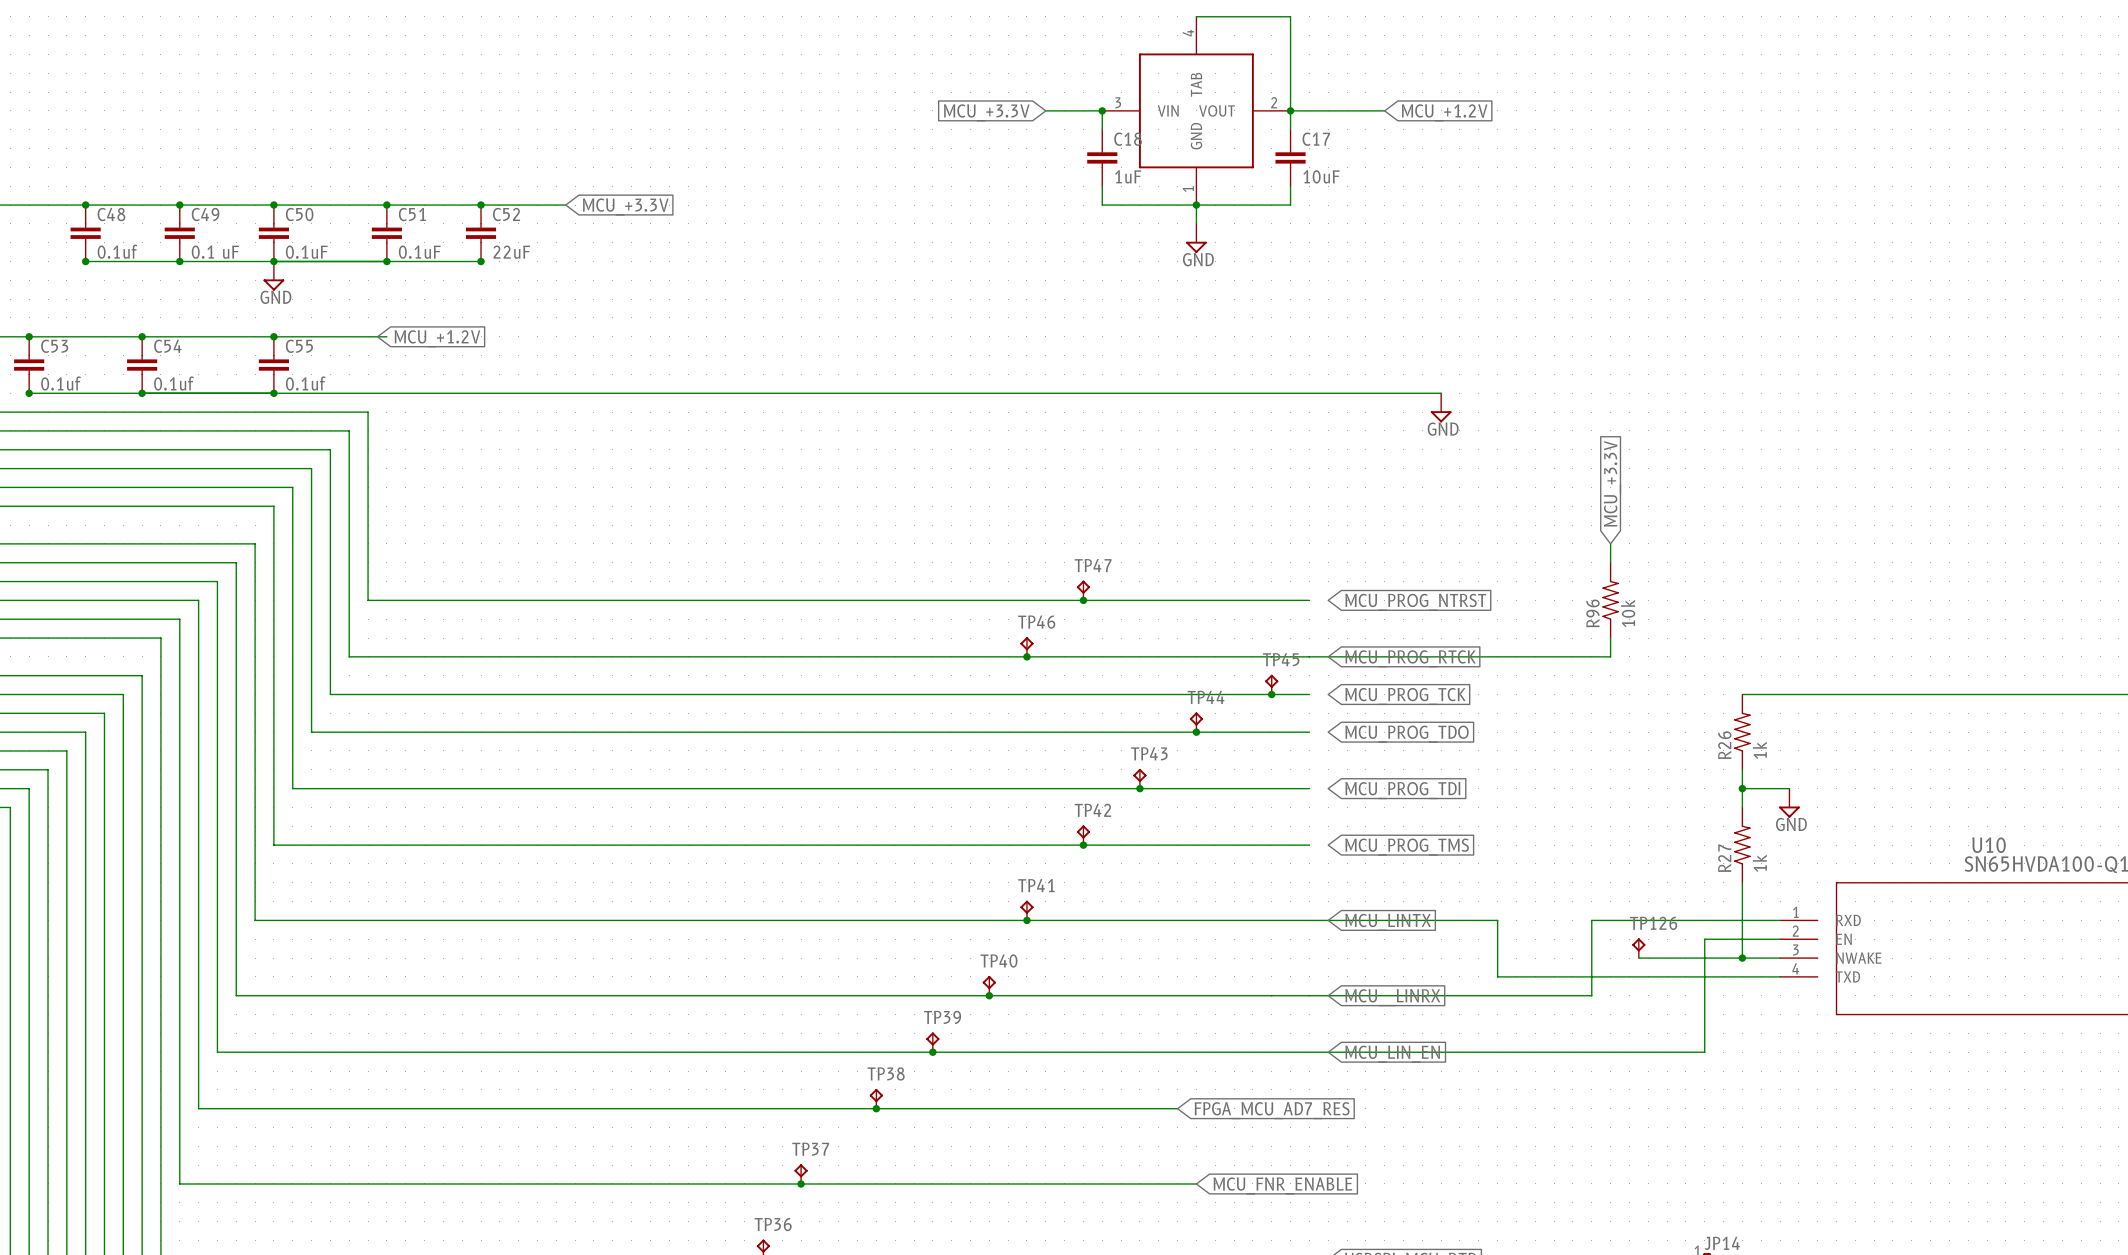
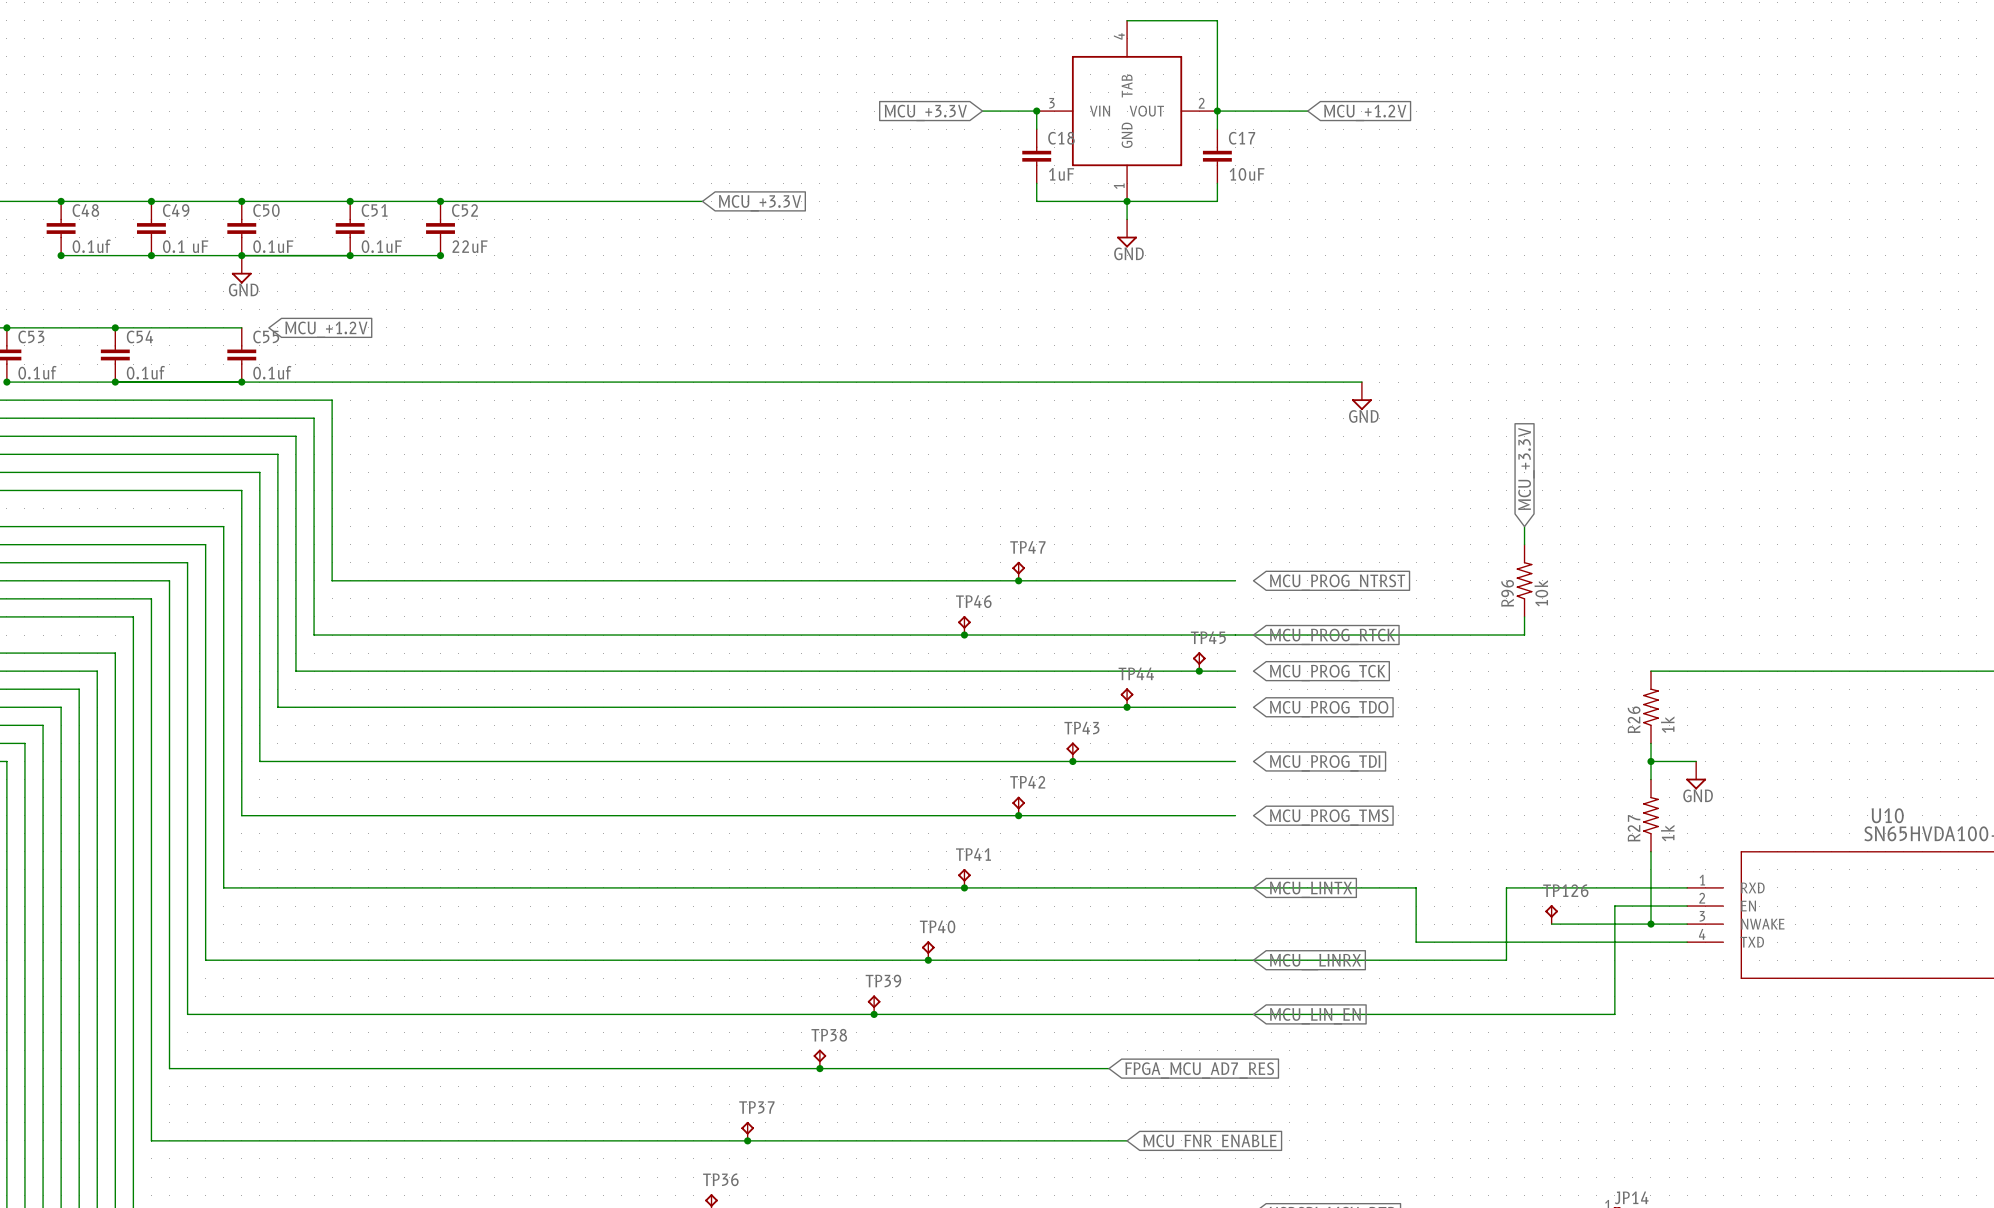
wire: none -> (521, 201) (702, 201)
global label: MCU_+3.3V (625, 206) -> none
global label: none -> MCU_+3.3V (760, 203)
wire: (273, 336) (386, 336) -> none
junction: (273, 336) -> none
global label position: MCU_+1.2V (437, 338) -> MCU_+1.2V (326, 329)

